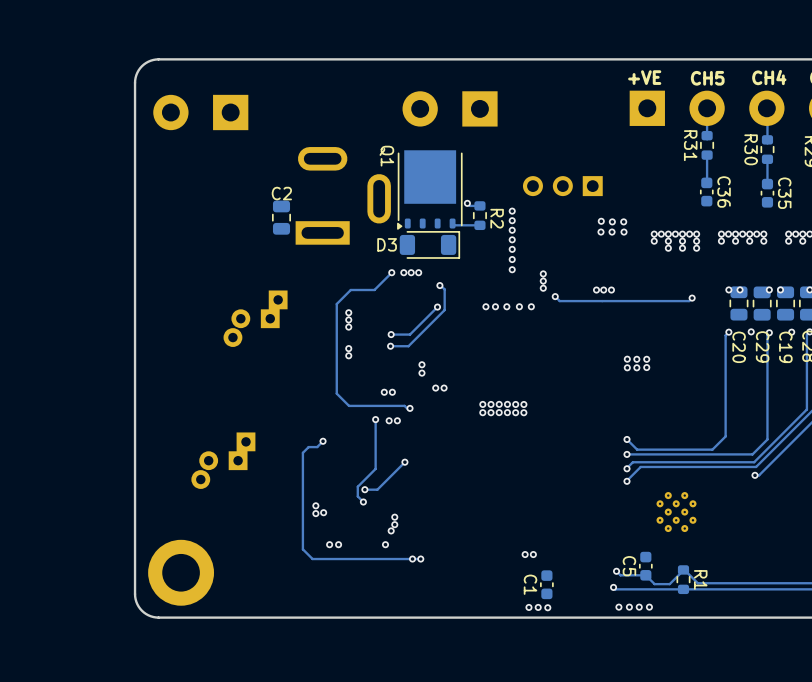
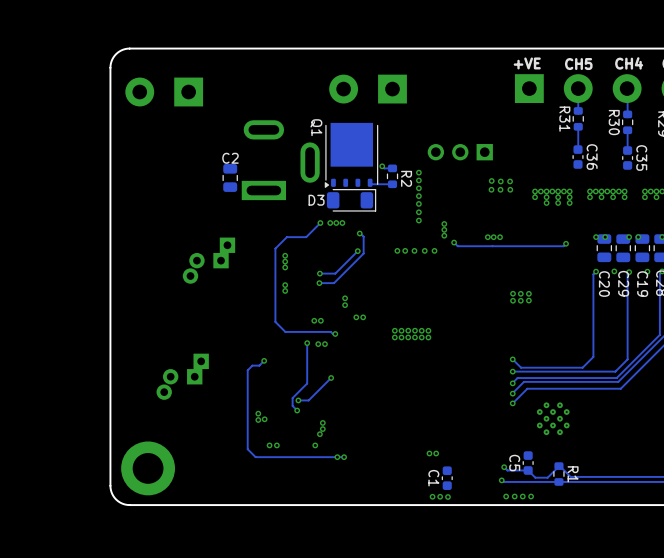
track: none -> (617, 388) (527, 388) (512, 403)
via: (754, 475) -> none
via: none -> (512, 403)

